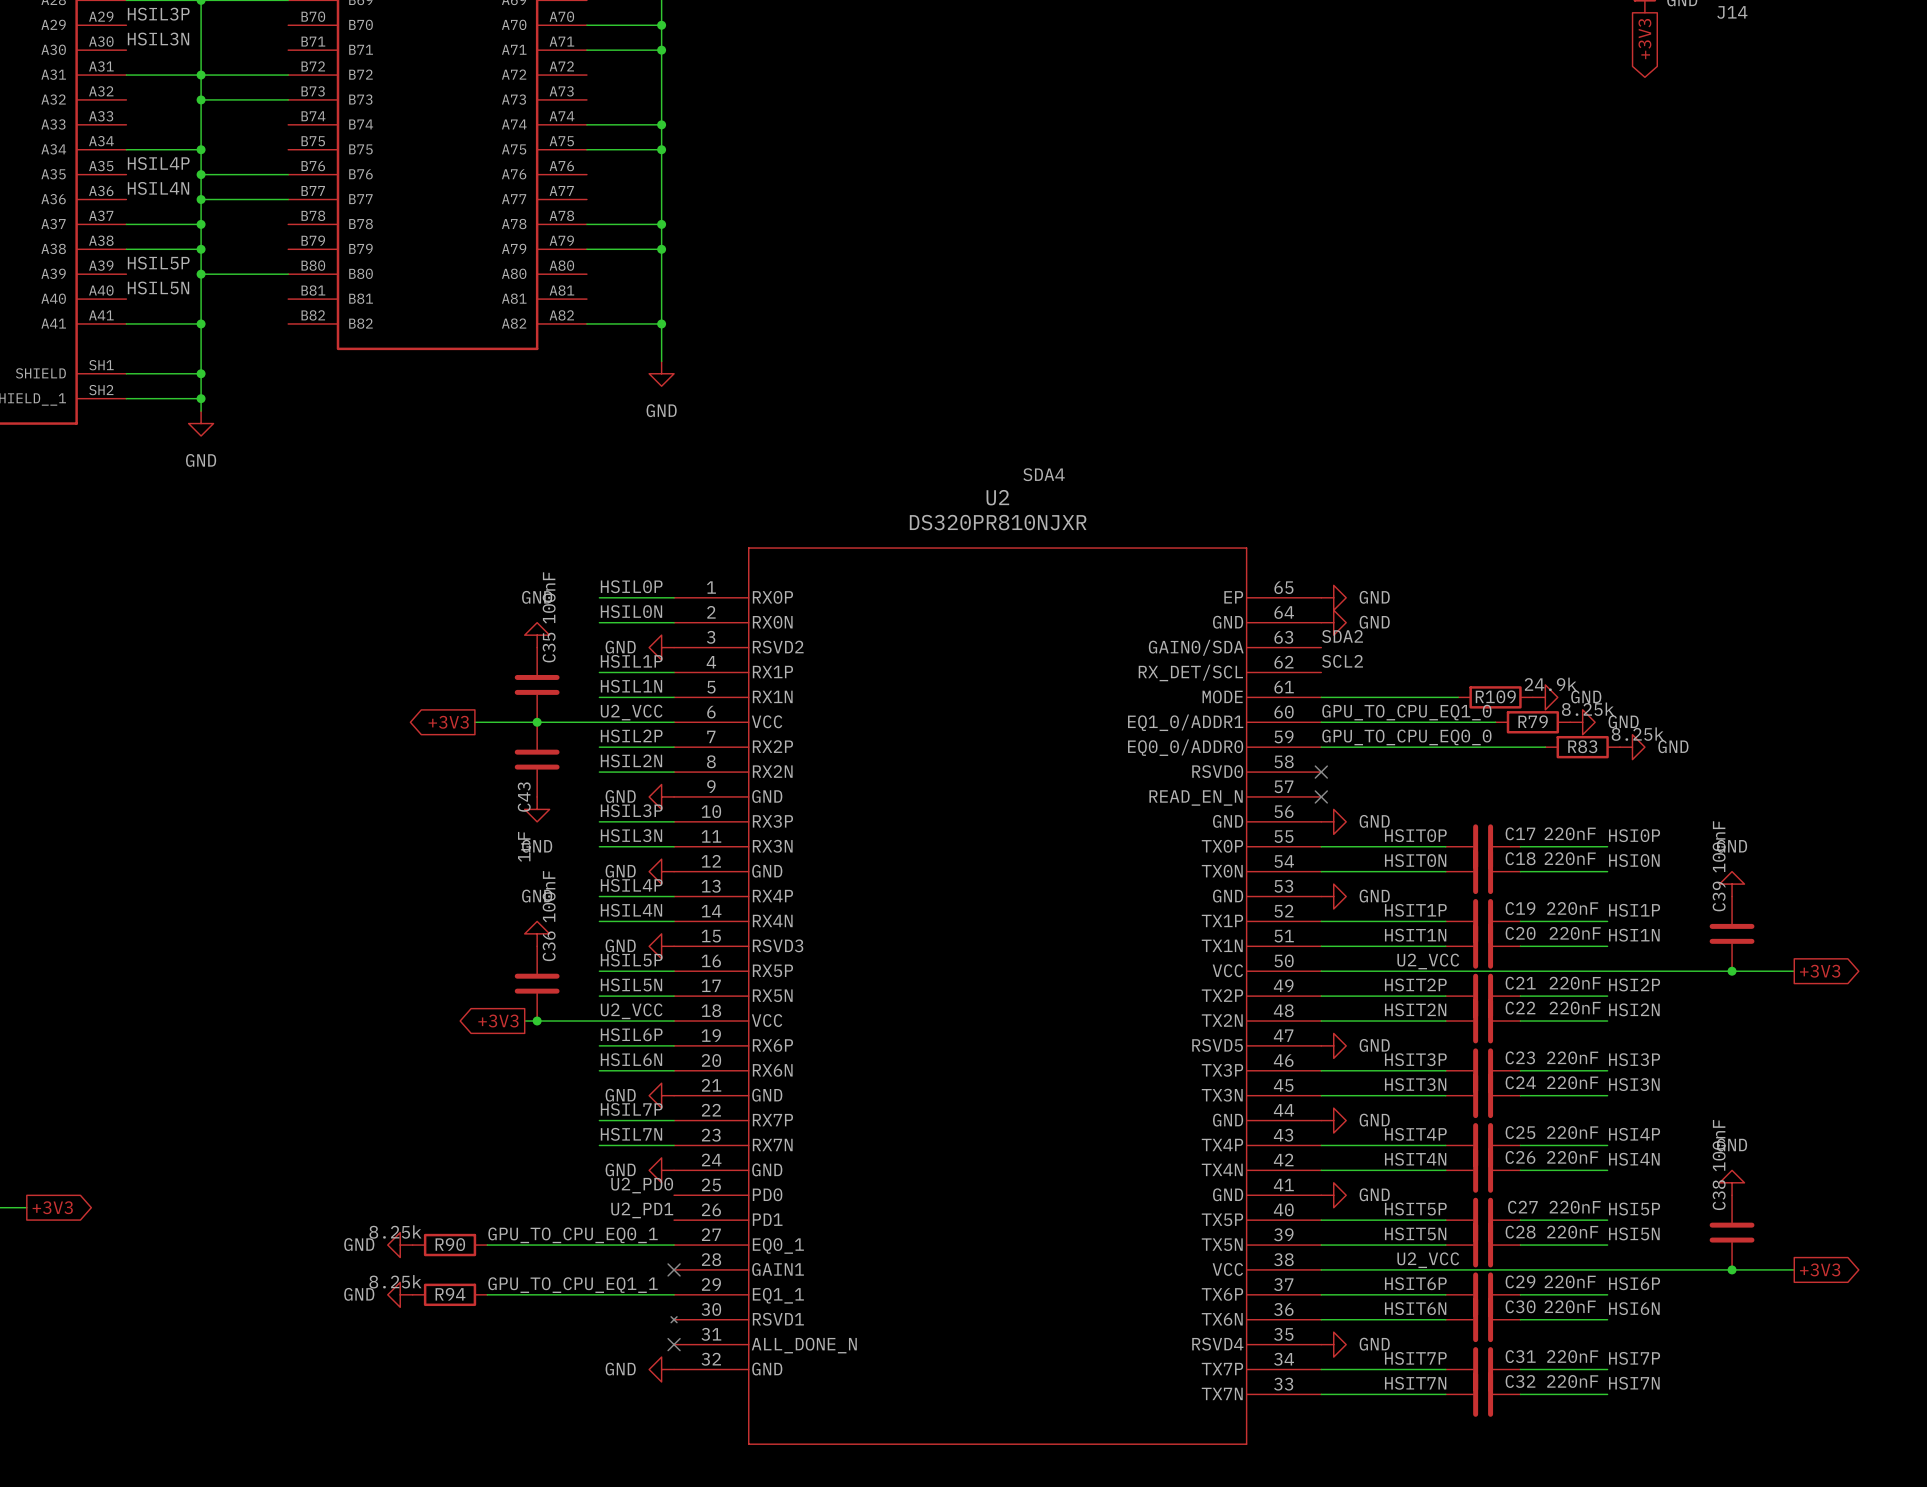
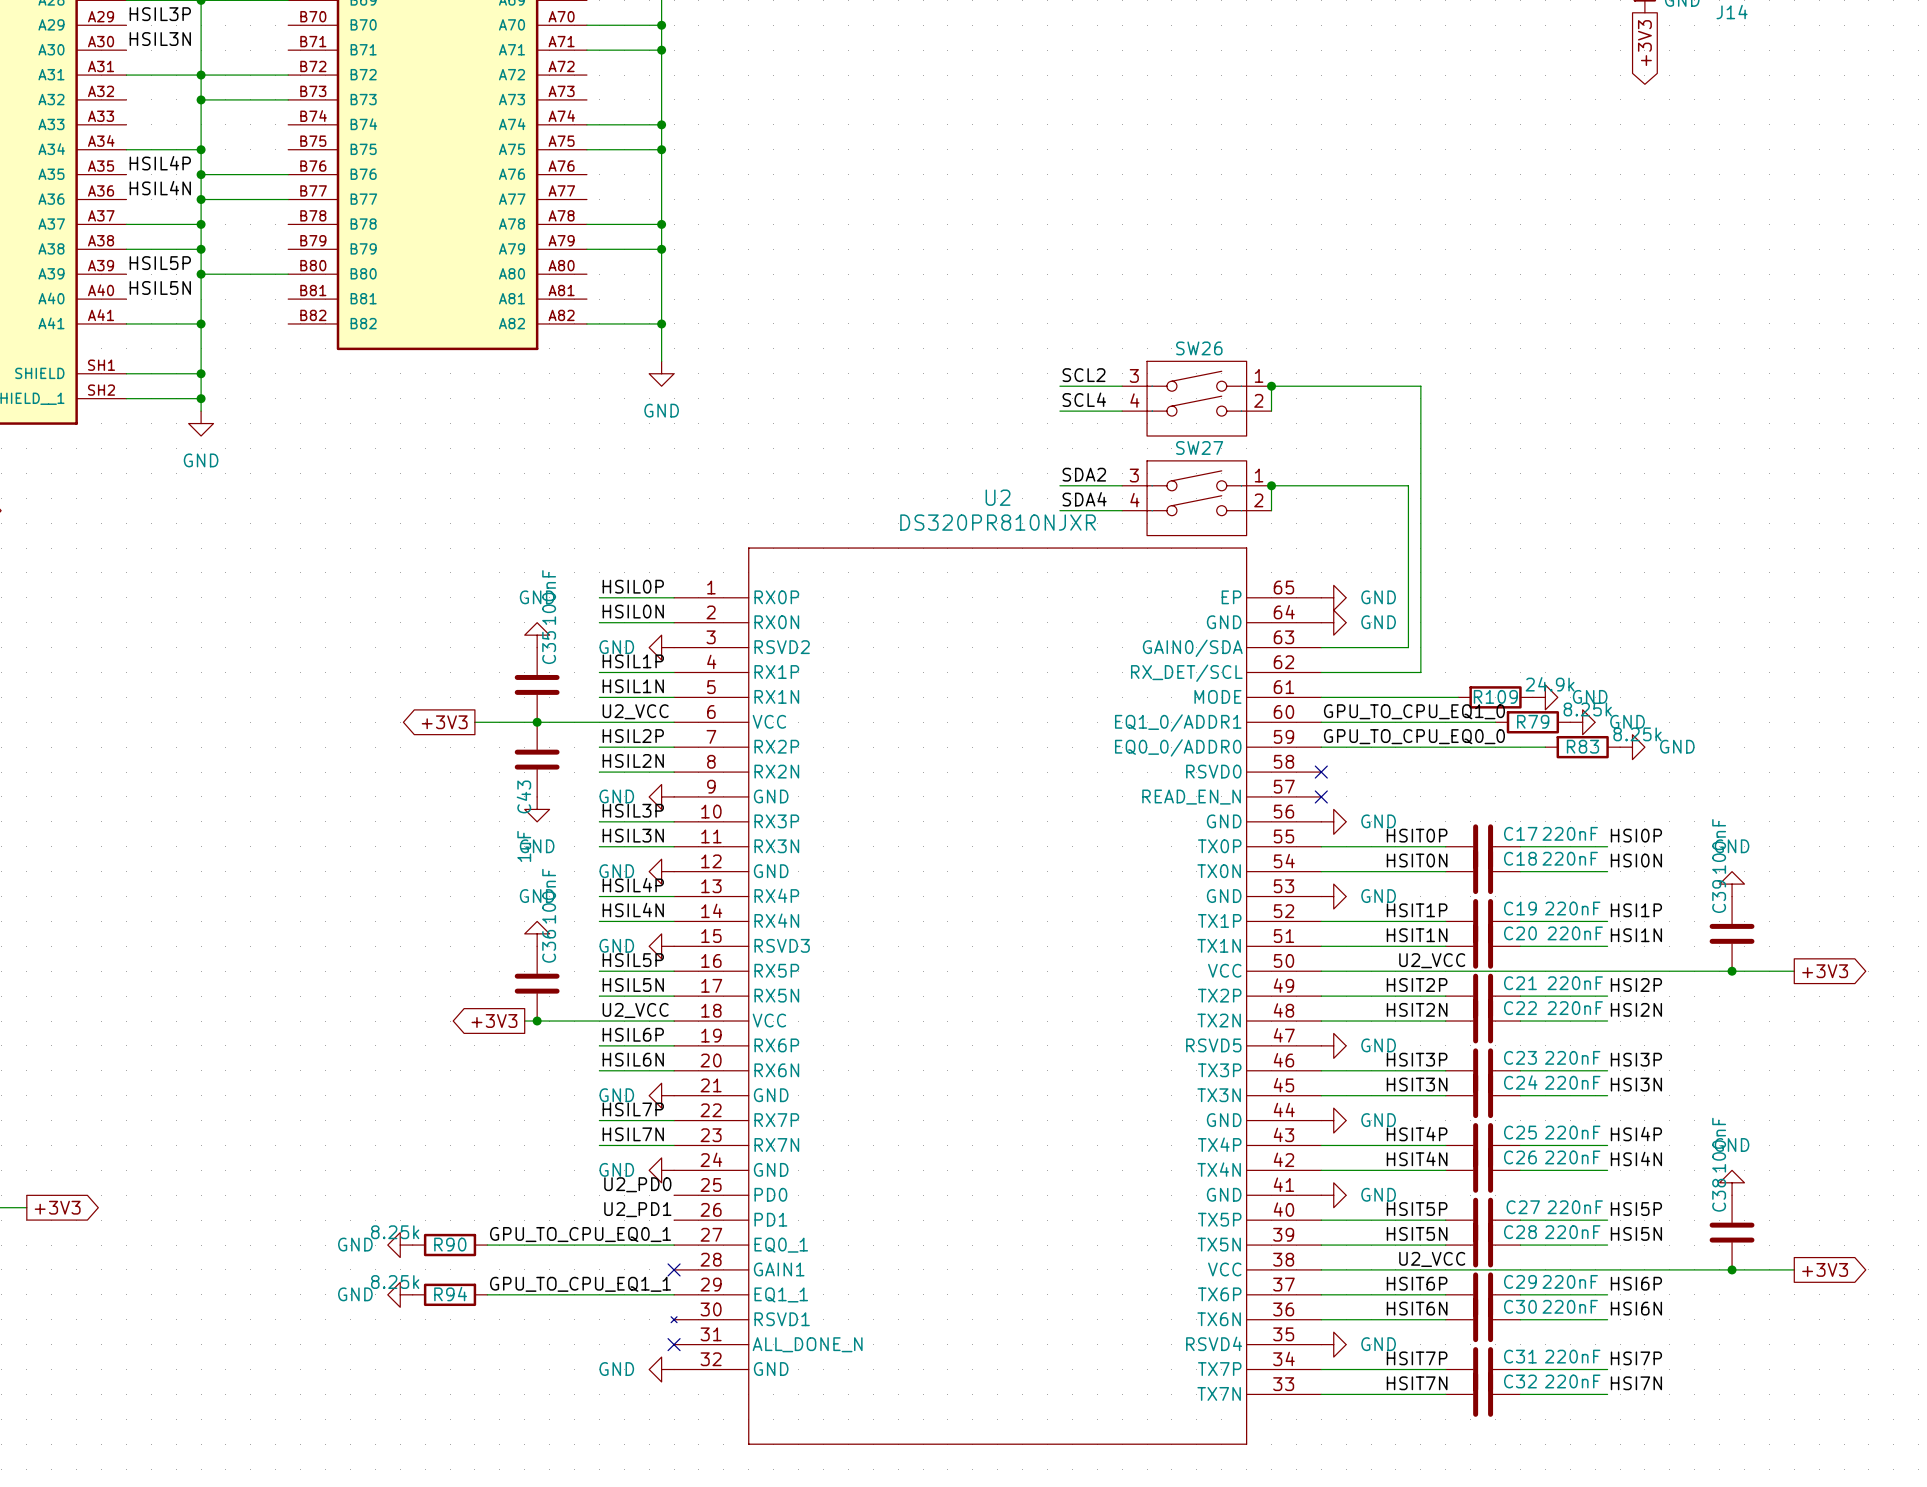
label: none -> SCL2 (1084, 375)
wire: none -> (1059, 386) (1122, 386)
junction: none -> (1271, 386)
SW26: none -> (1196, 398)
label: none -> SCL4 (1084, 399)
wire: none -> (1059, 411) (1122, 411)
wire: none -> (1271, 411) (1271, 386) (1420, 386) (1420, 672) (1321, 672)
label position: SDA4 (1044, 474) -> SDA4 (1084, 499)
label: none -> SDA2 (1084, 474)
wire: none -> (1059, 485) (1122, 485)
junction: none -> (1271, 485)
SW27: none -> (1196, 498)
wire: none -> (1059, 510) (1122, 510)
wire: none -> (1271, 510) (1271, 485) (1408, 485) (1408, 647) (1321, 647)
label: SDA2 (1342, 636) -> none
label: SCL2 (1342, 661) -> none

